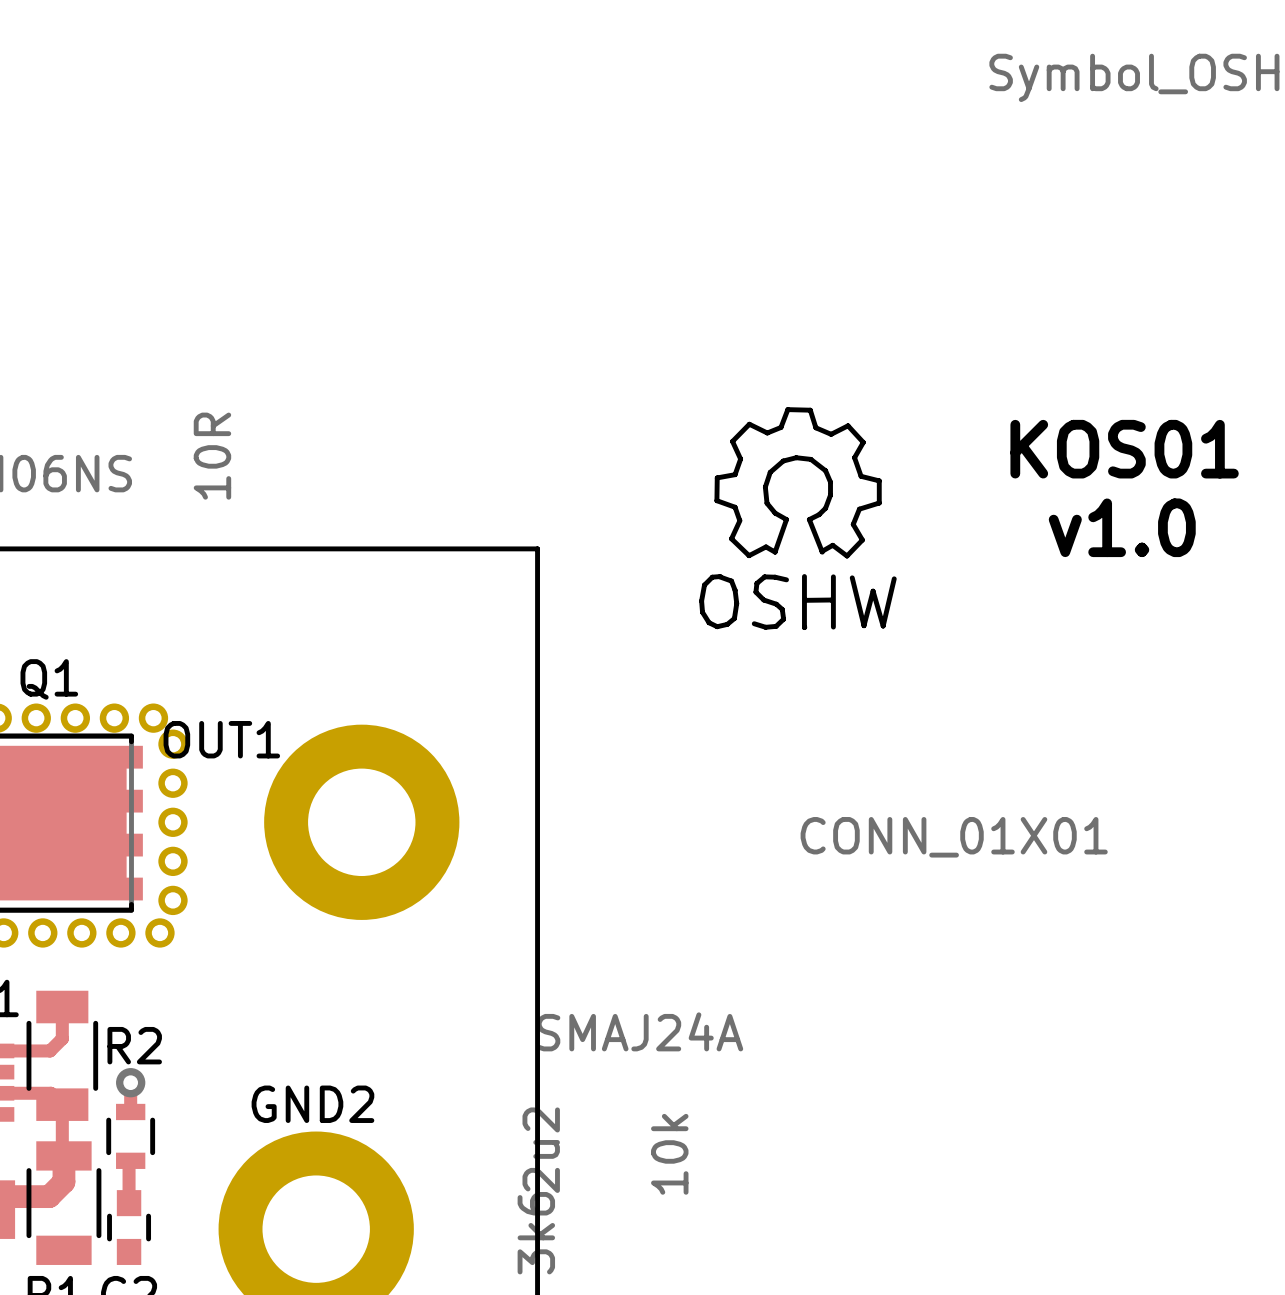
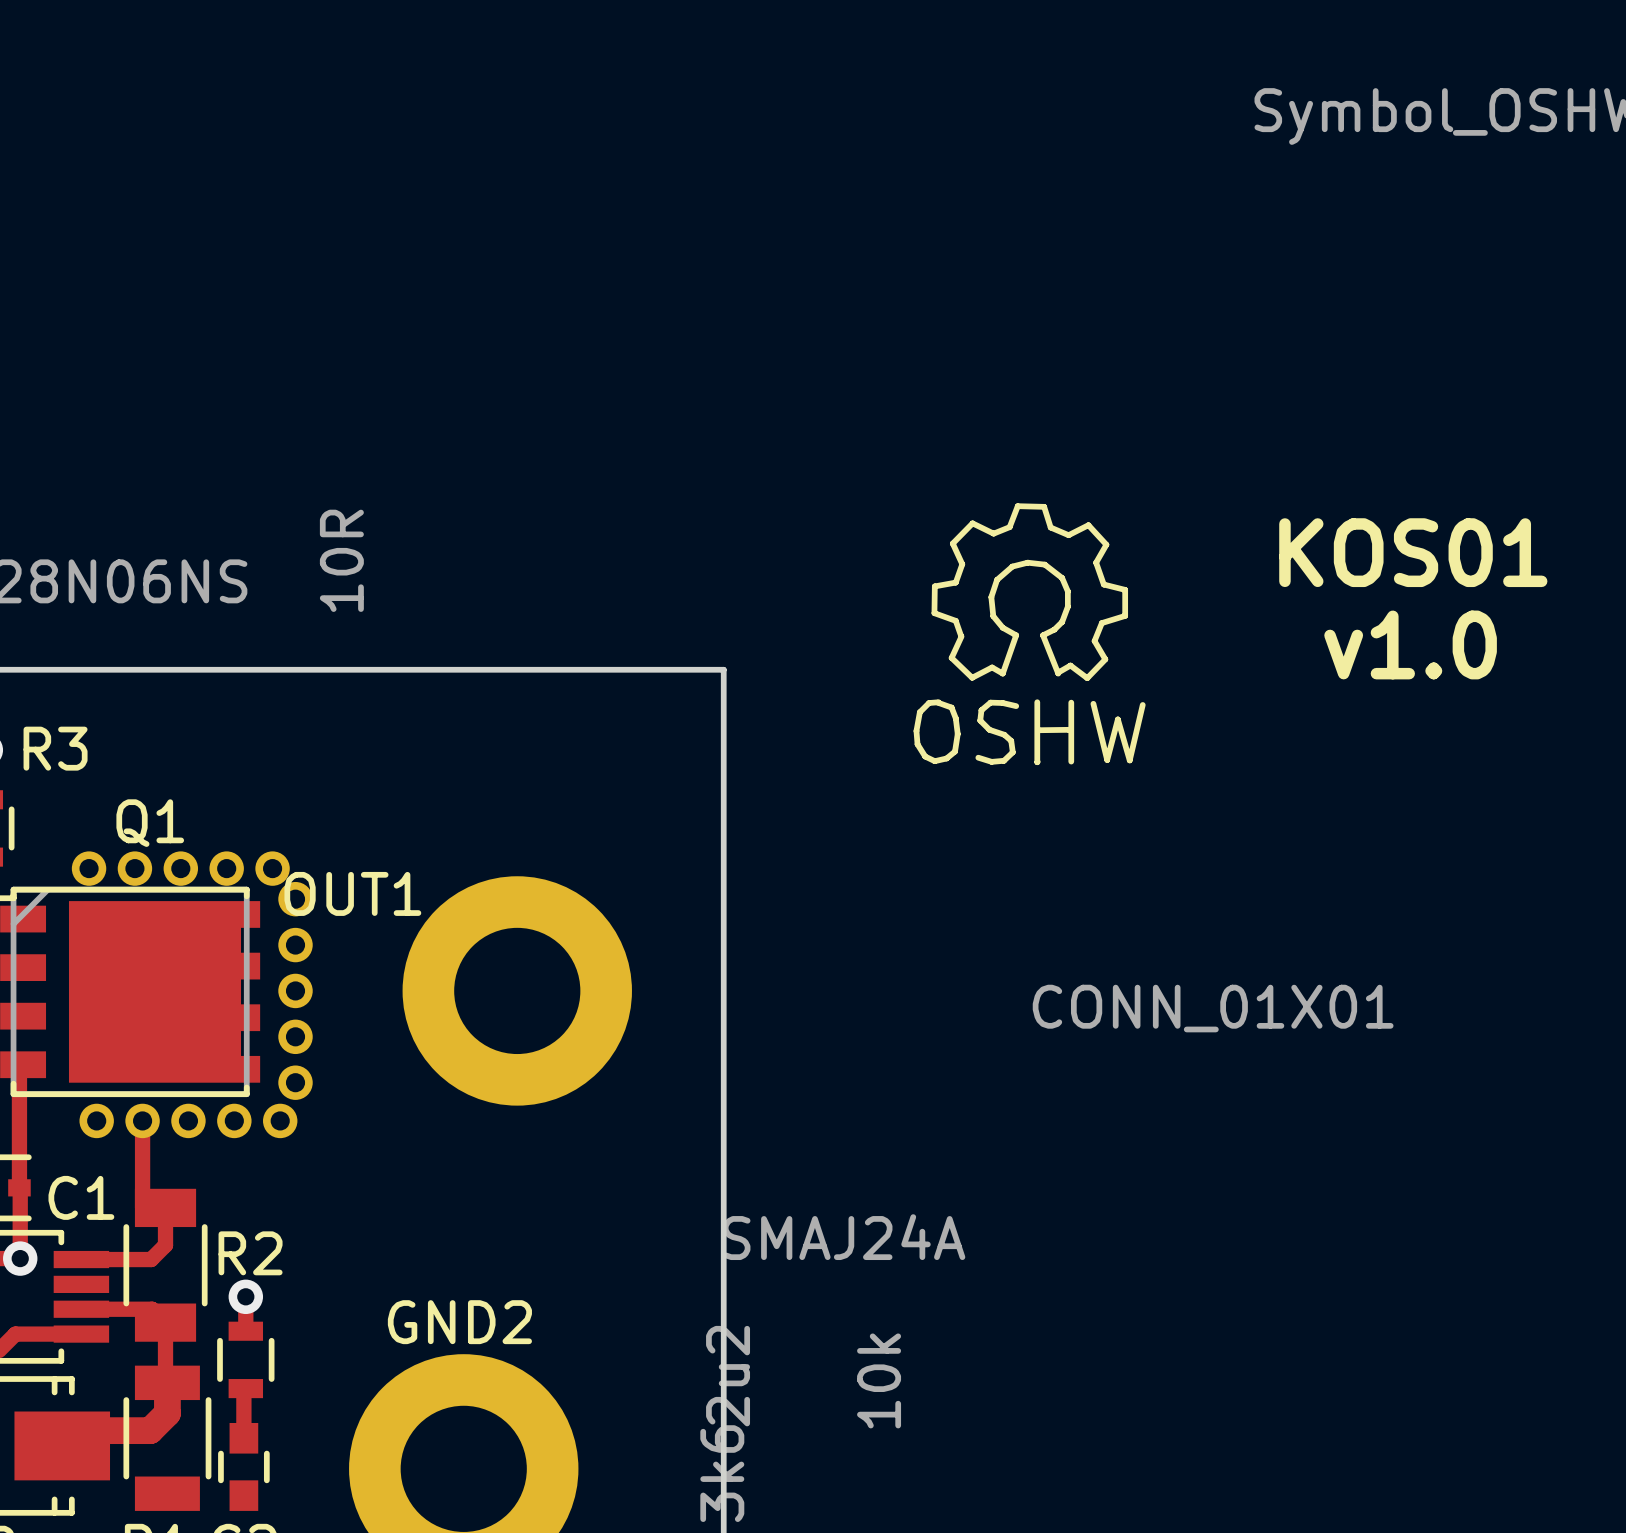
track: none -> (142, 1120) (142, 1207)

